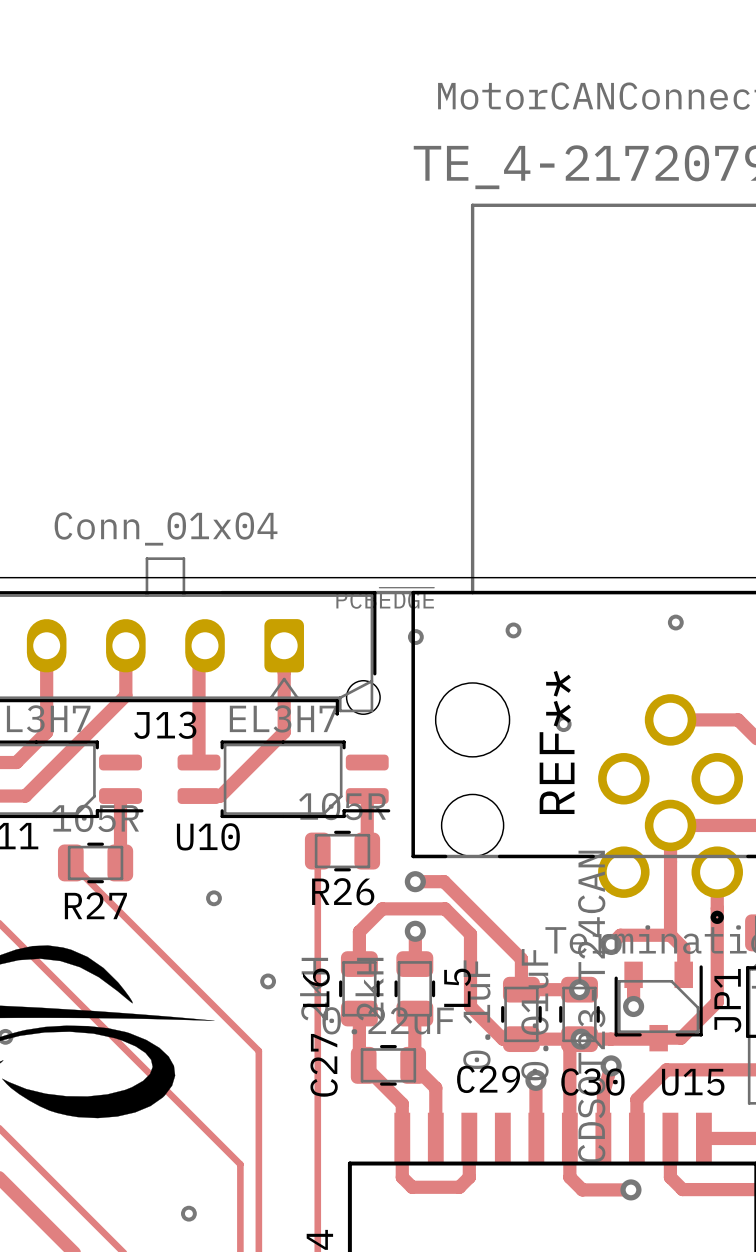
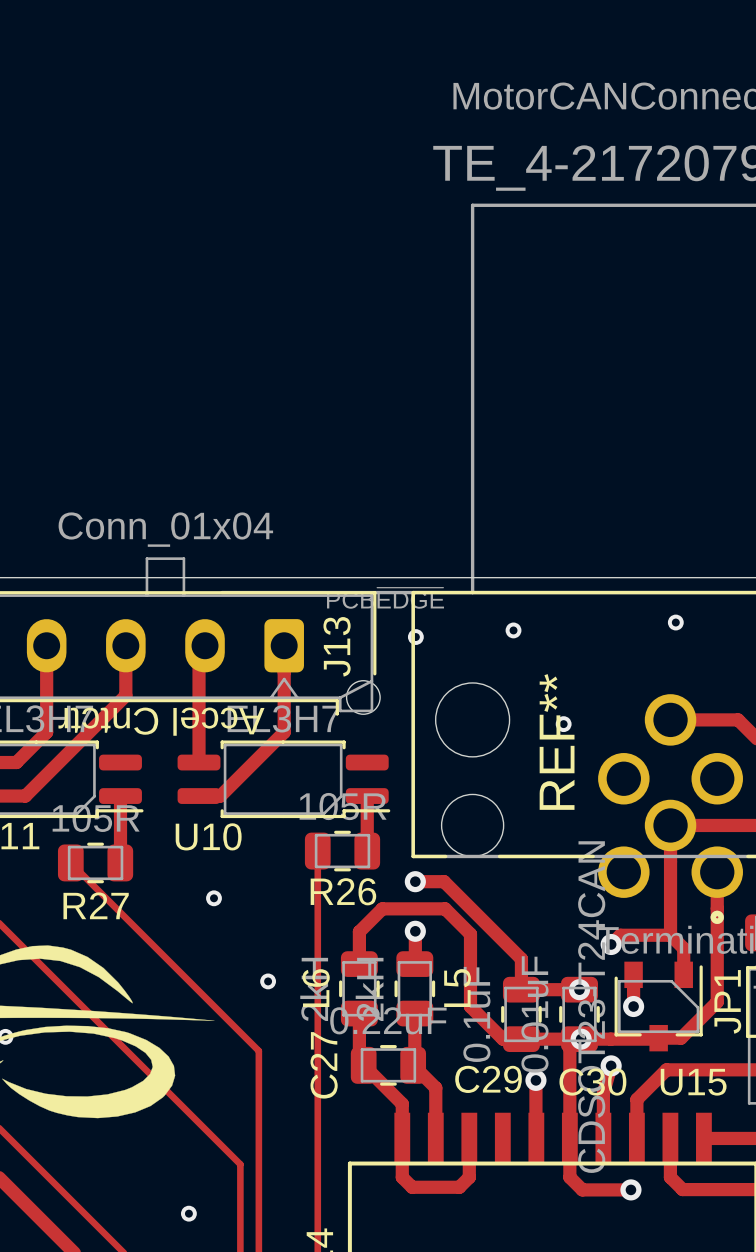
text: none -> Accel Cntctr (161, 721)
J13 name rotation: 0° (165, 725) -> 90° counterclockwise (337, 646)
J13 name position: J13 (165, 725) -> J13 (337, 646)

